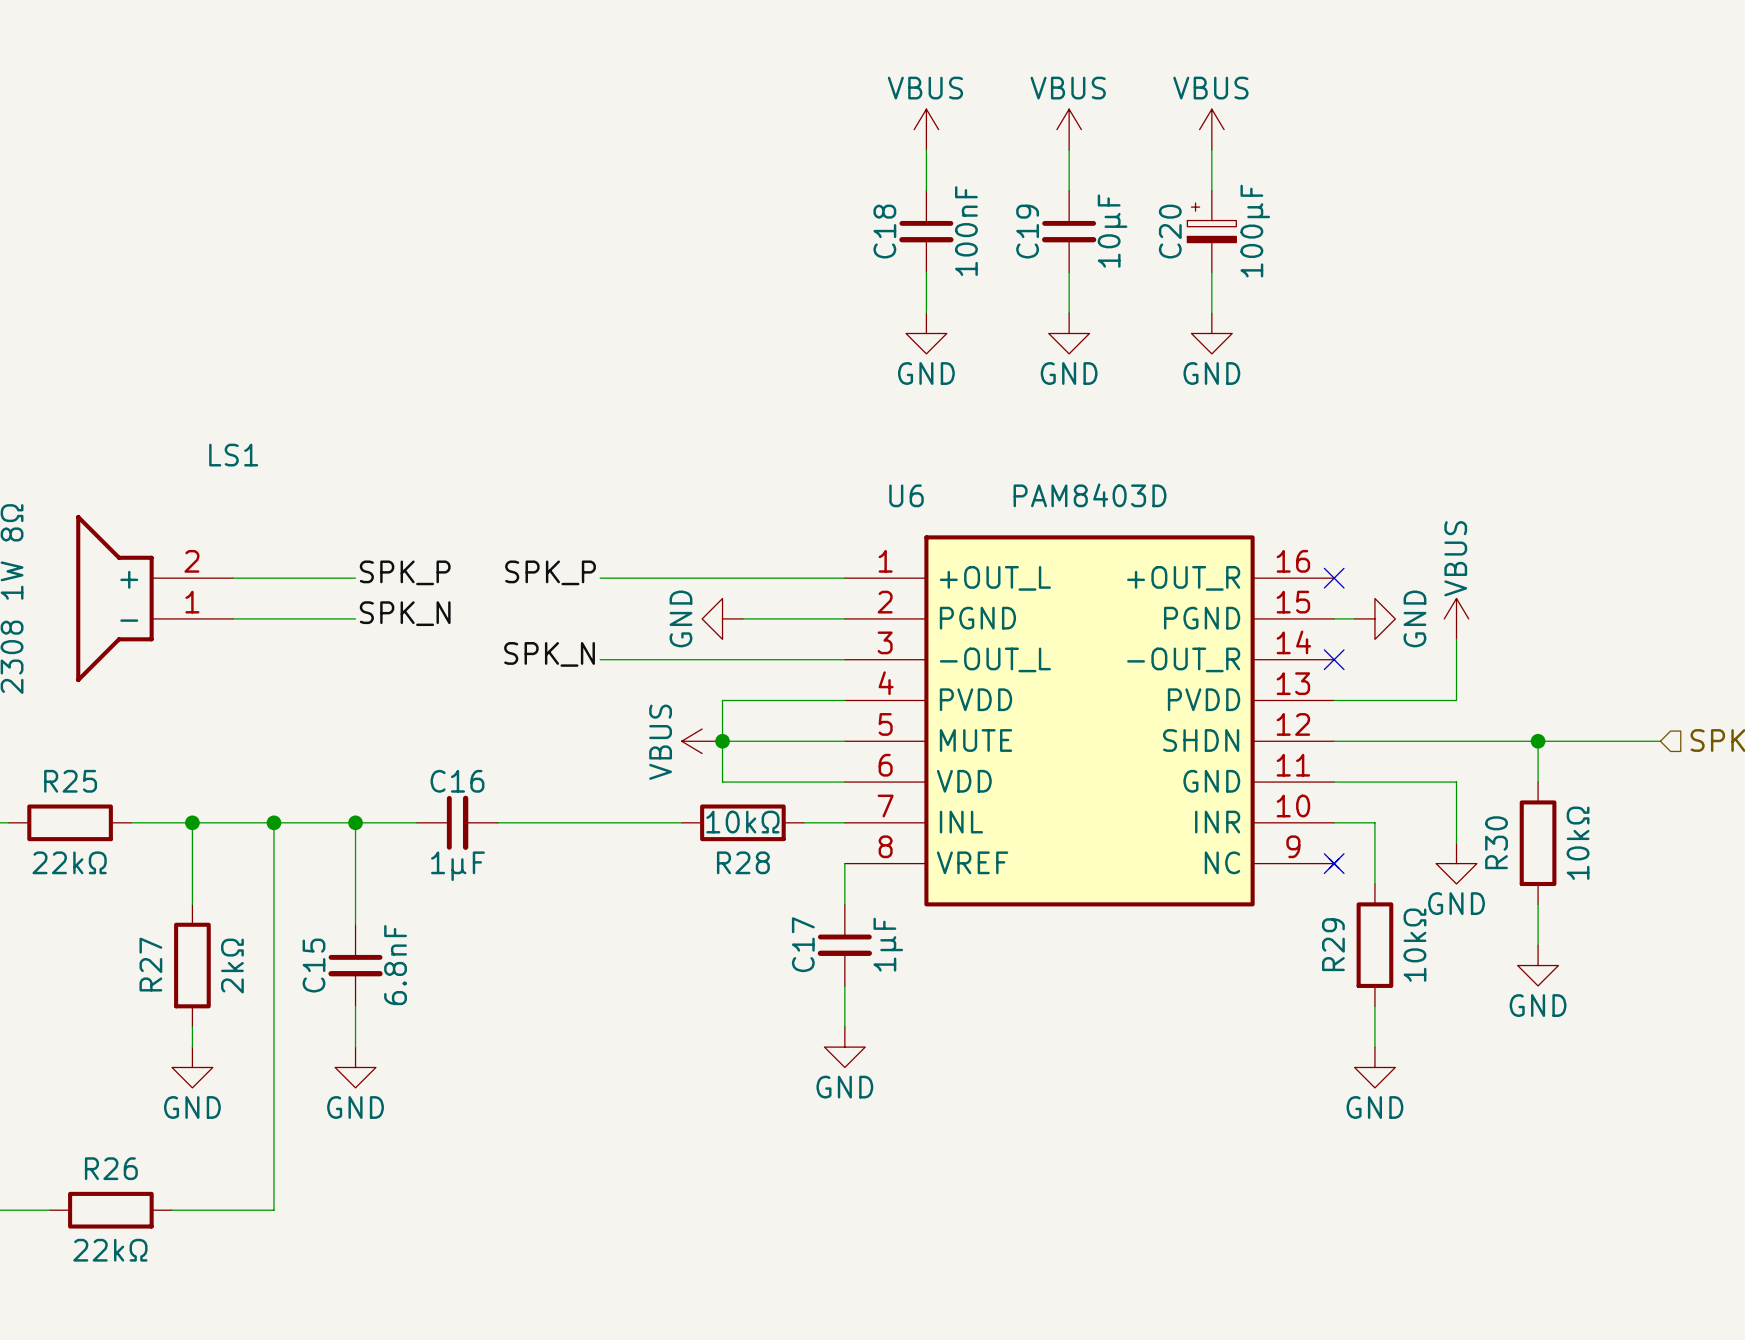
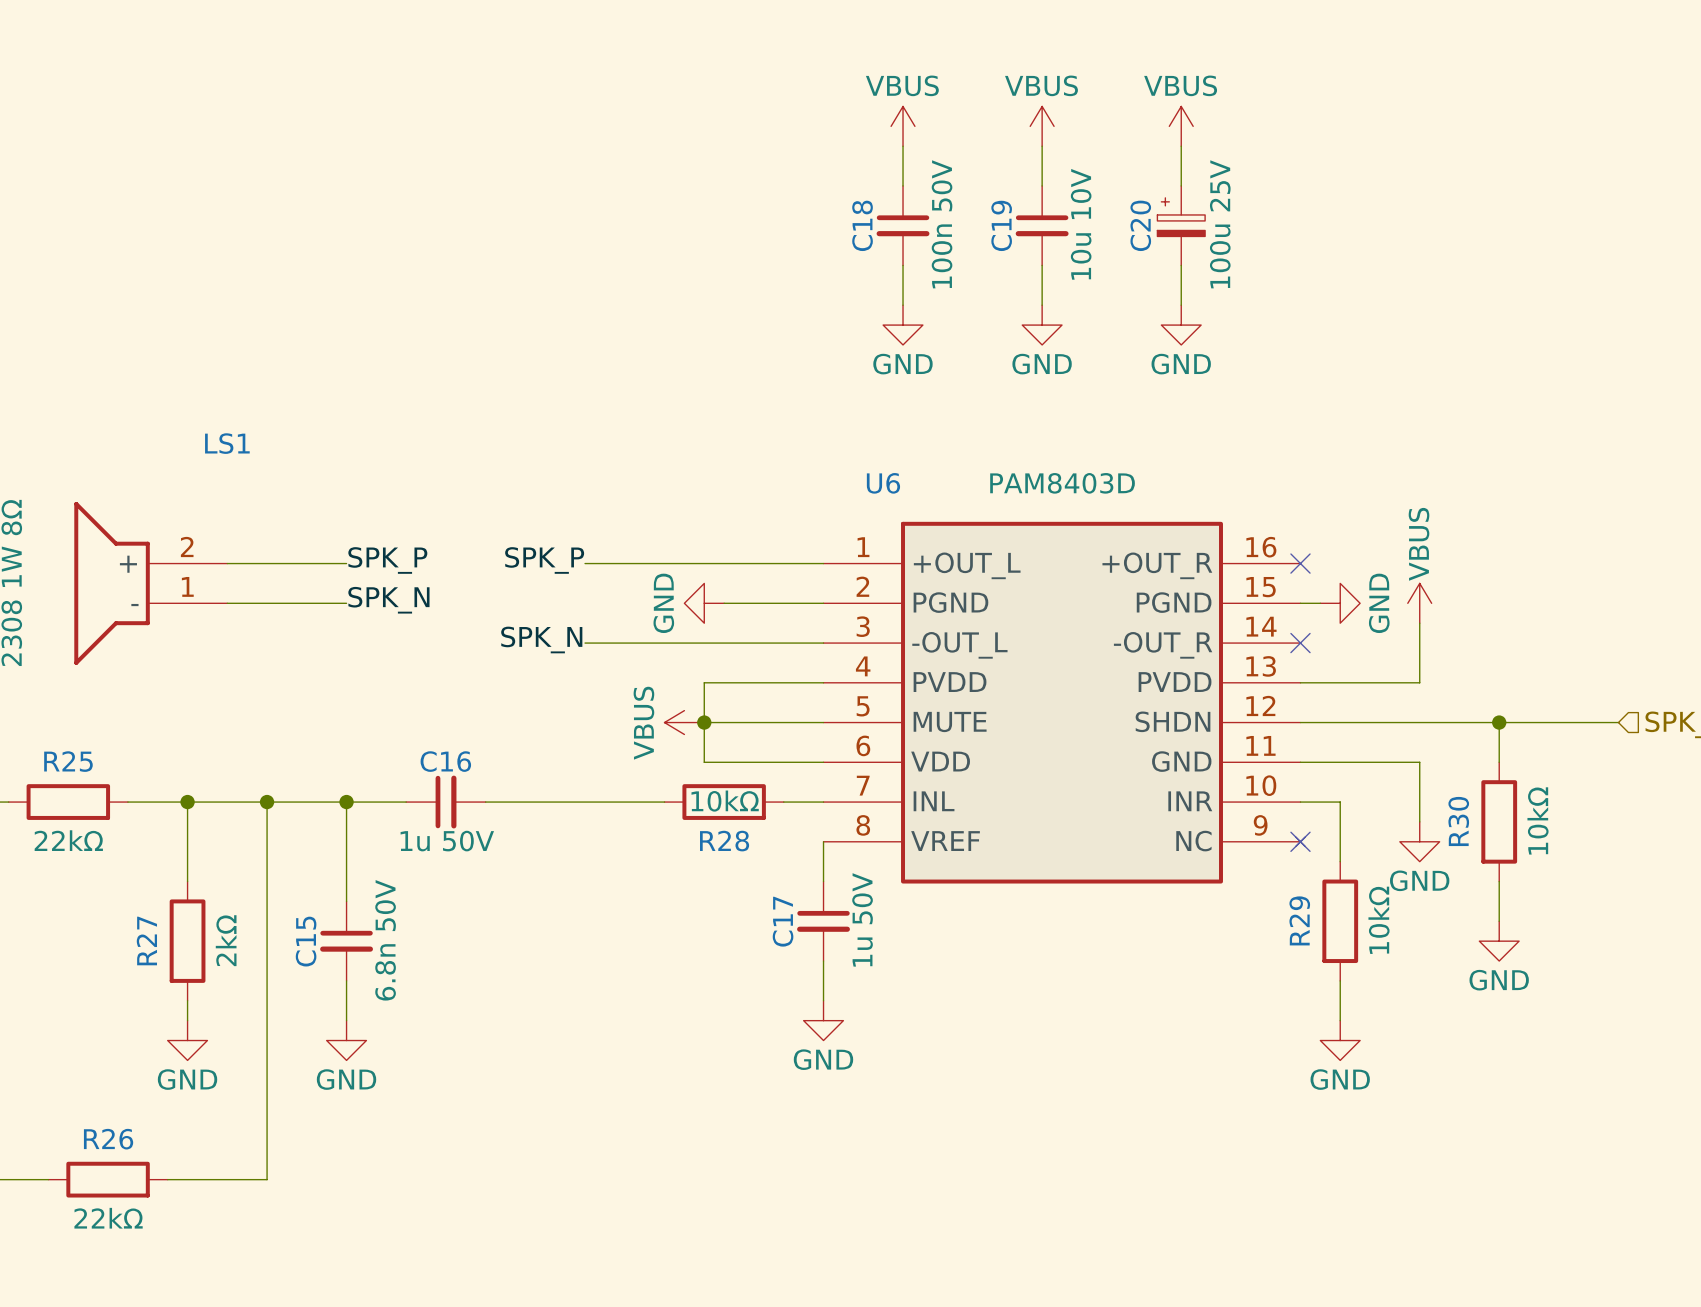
C18 value: 100nF (966, 231) -> 100n 50V (942, 224)
C19 value: 10µF (1112, 231) -> 10u 10V (1081, 224)
C20 value: 100µF (1255, 231) -> 100u 25V (1220, 224)
C16 value: 1µF (457, 866) -> 1u 50V (447, 841)
C17 value: 1µF (888, 944) -> 1u 50V (862, 919)
C15 value: 6.8nF (395, 965) -> 6.8n 50V (385, 940)

